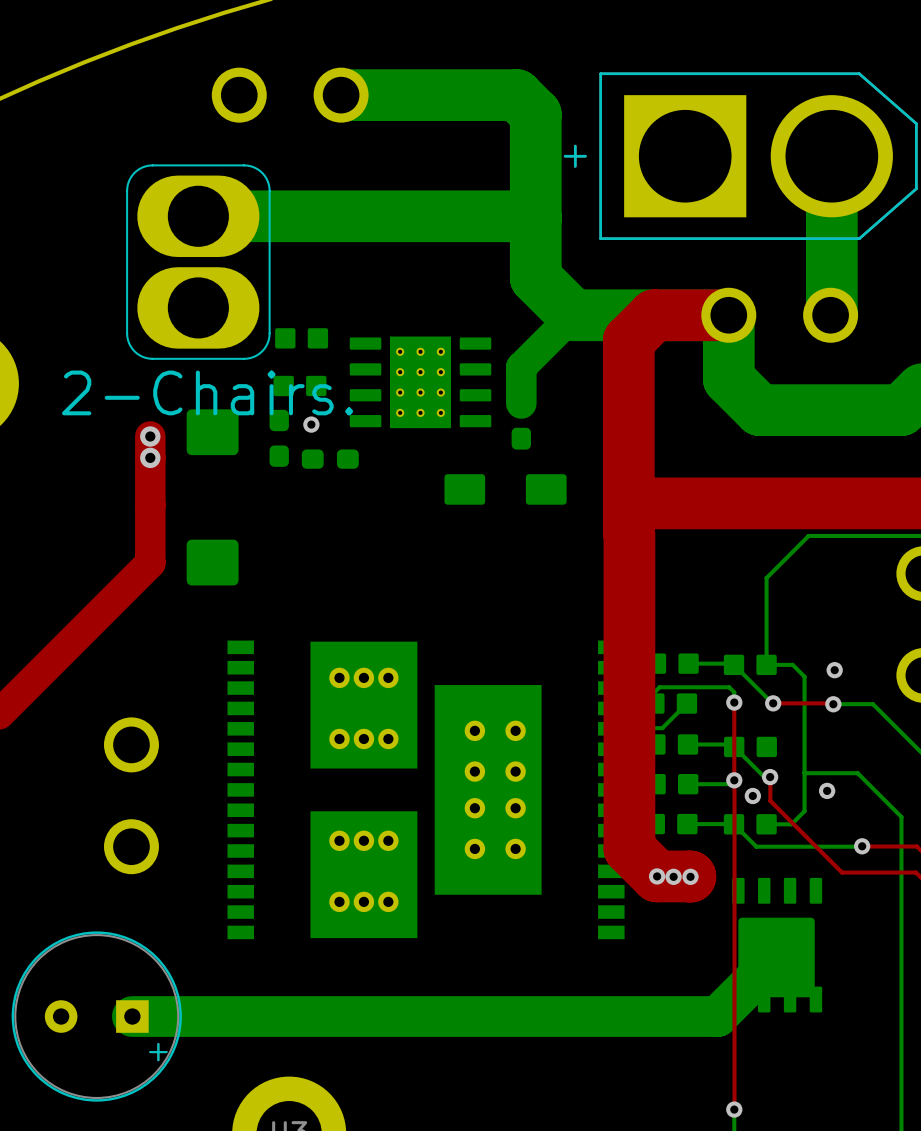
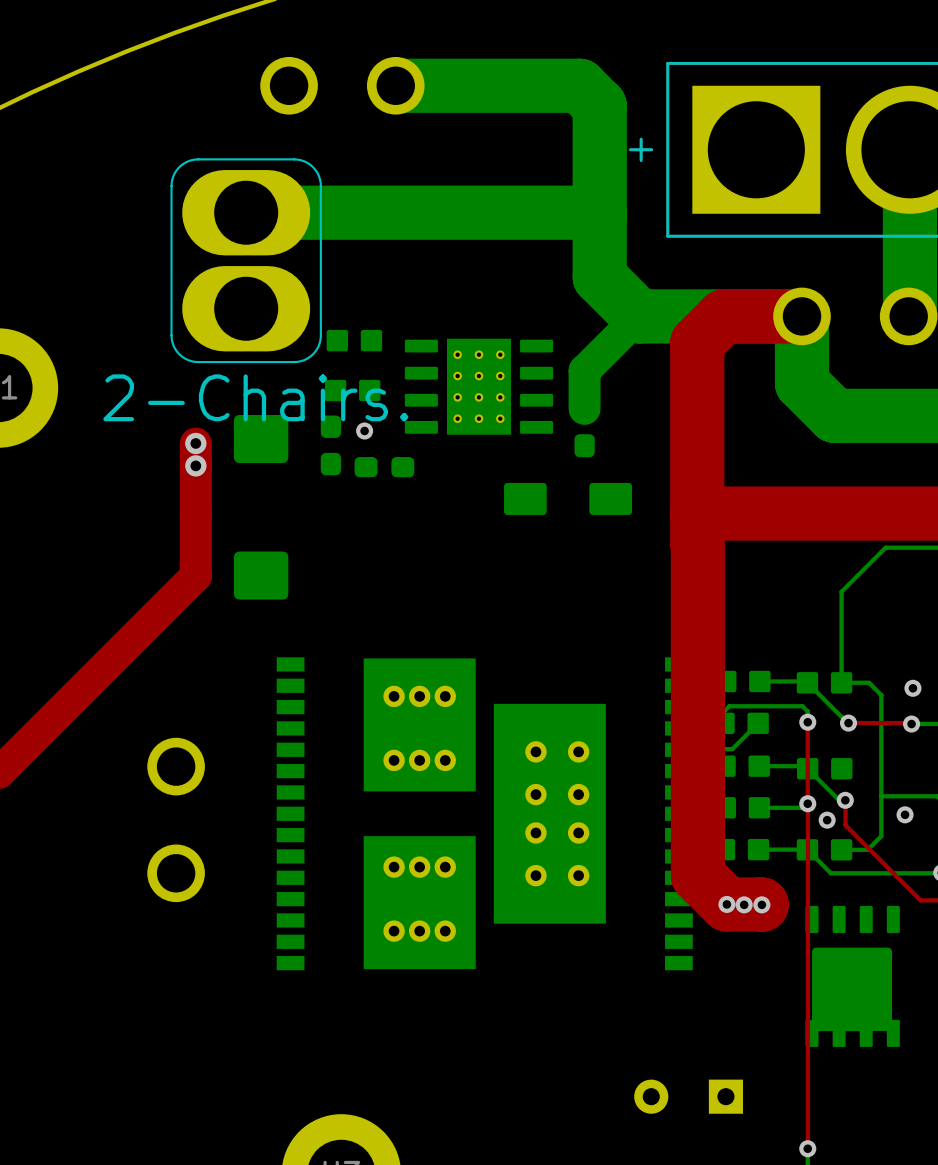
bottom track: (776, 957) (717, 1016) (132, 1016) -> none
part: (96, 1016) -> none
part: none -> (688, 1096)

